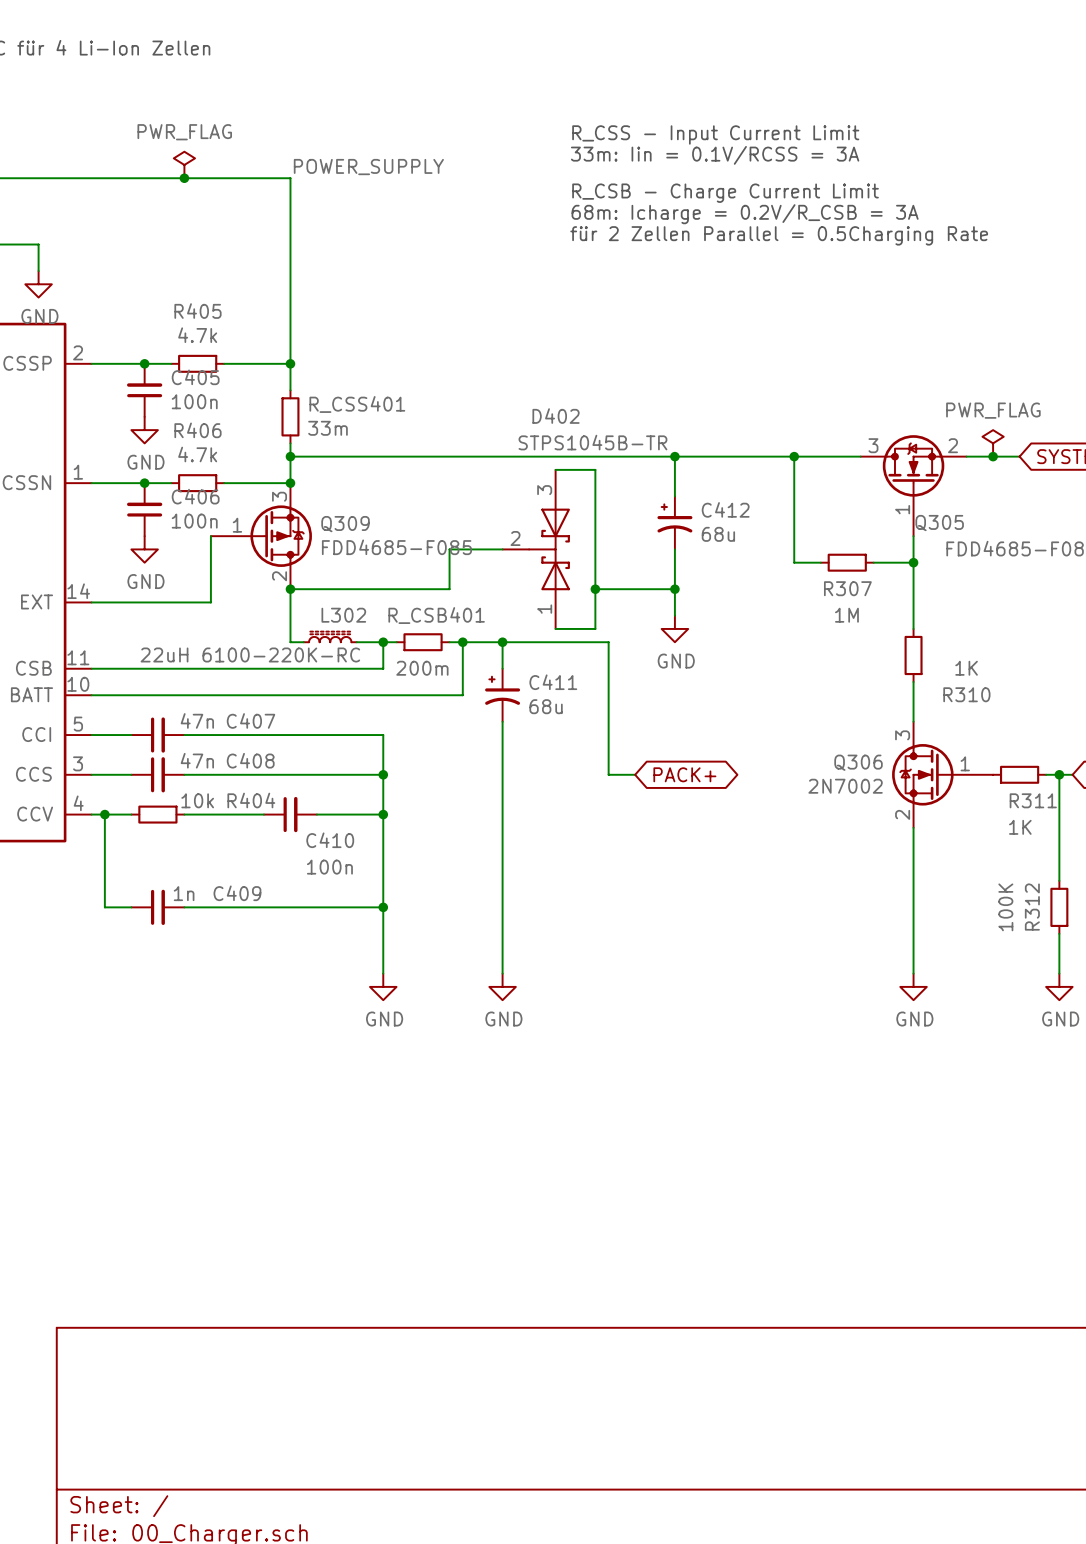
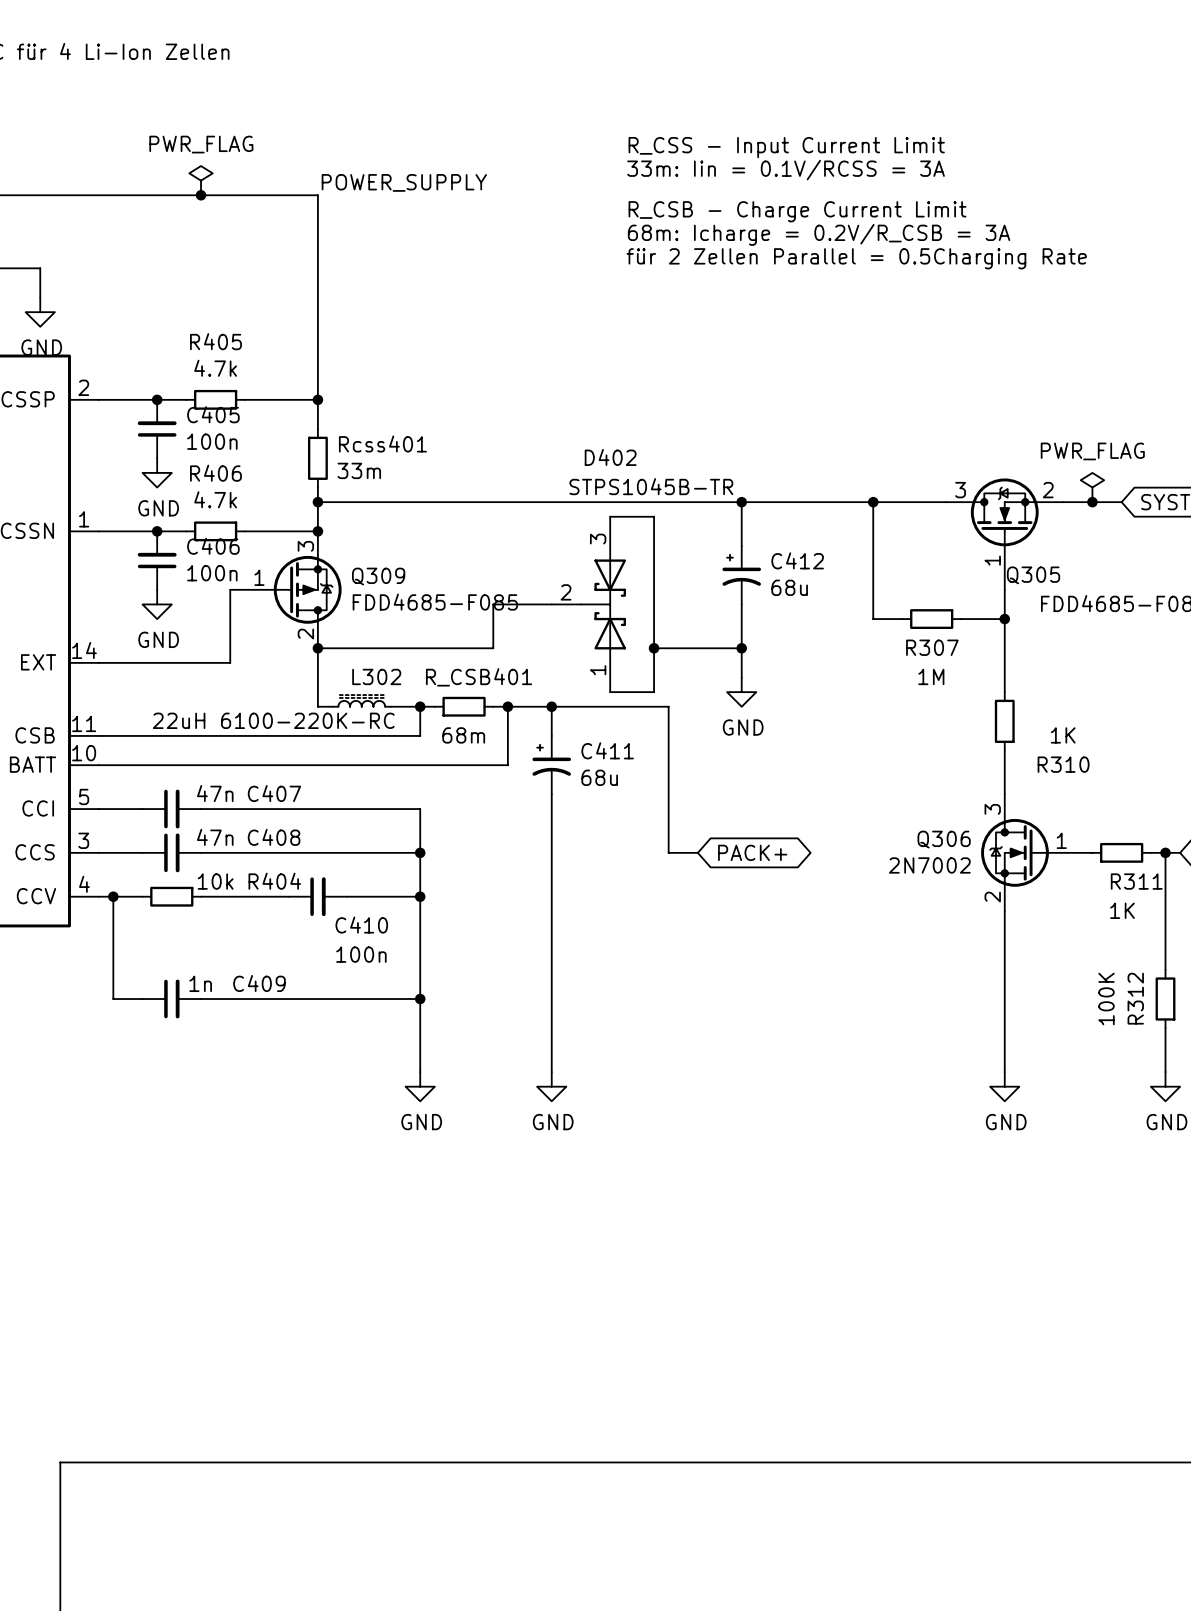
R_CSS401 name: R_CSS401 (357, 404) -> Rcss401 (382, 443)
R_CSB401 value: 200m (422, 668) -> 68m (463, 735)

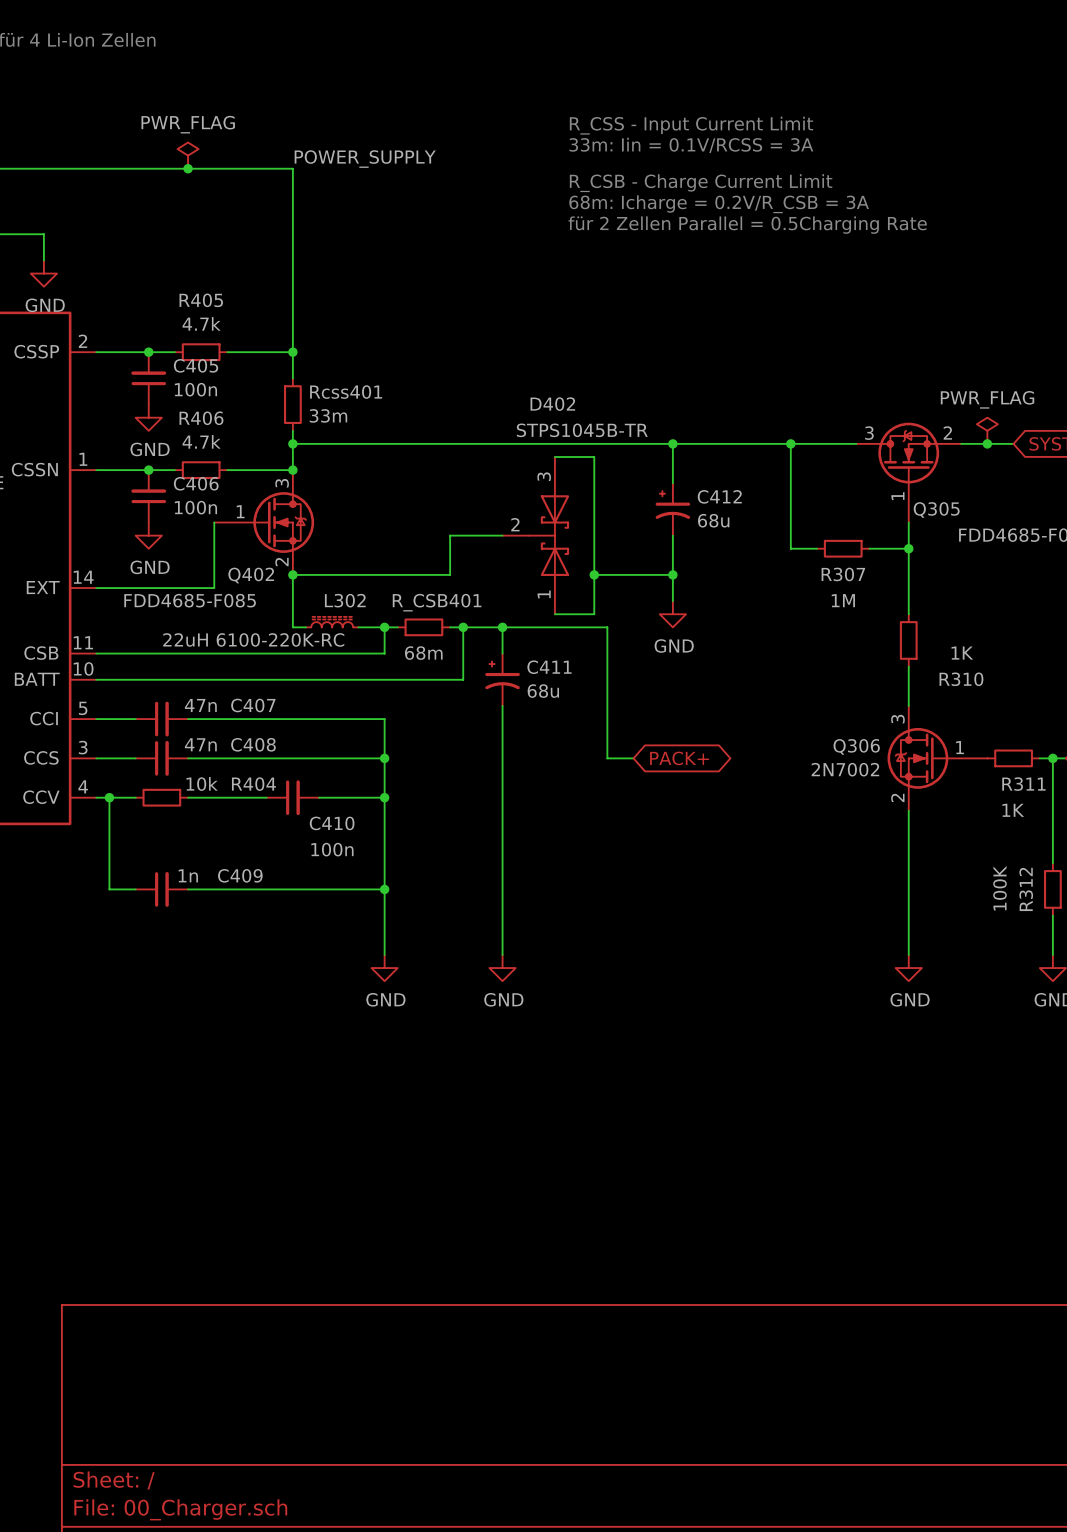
Q309: FDD4685-F085 (285, 589) -> none
Q402: none -> FDD4685-F085 (264, 522)

